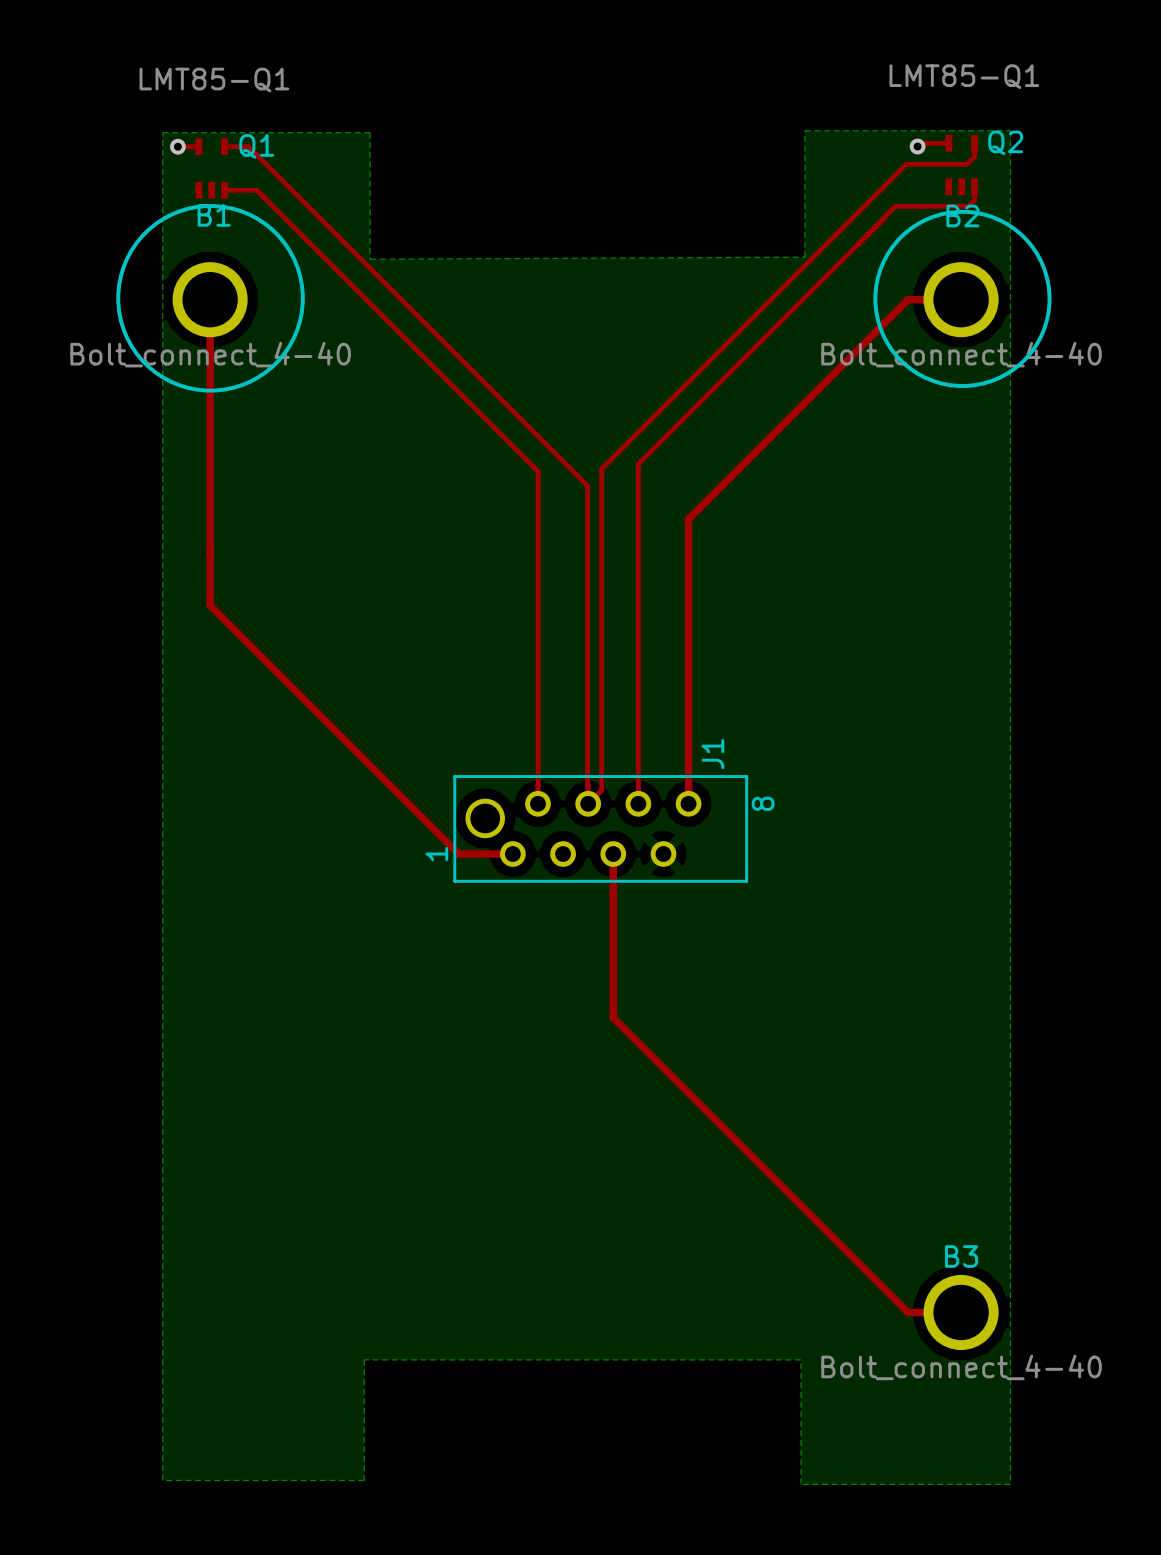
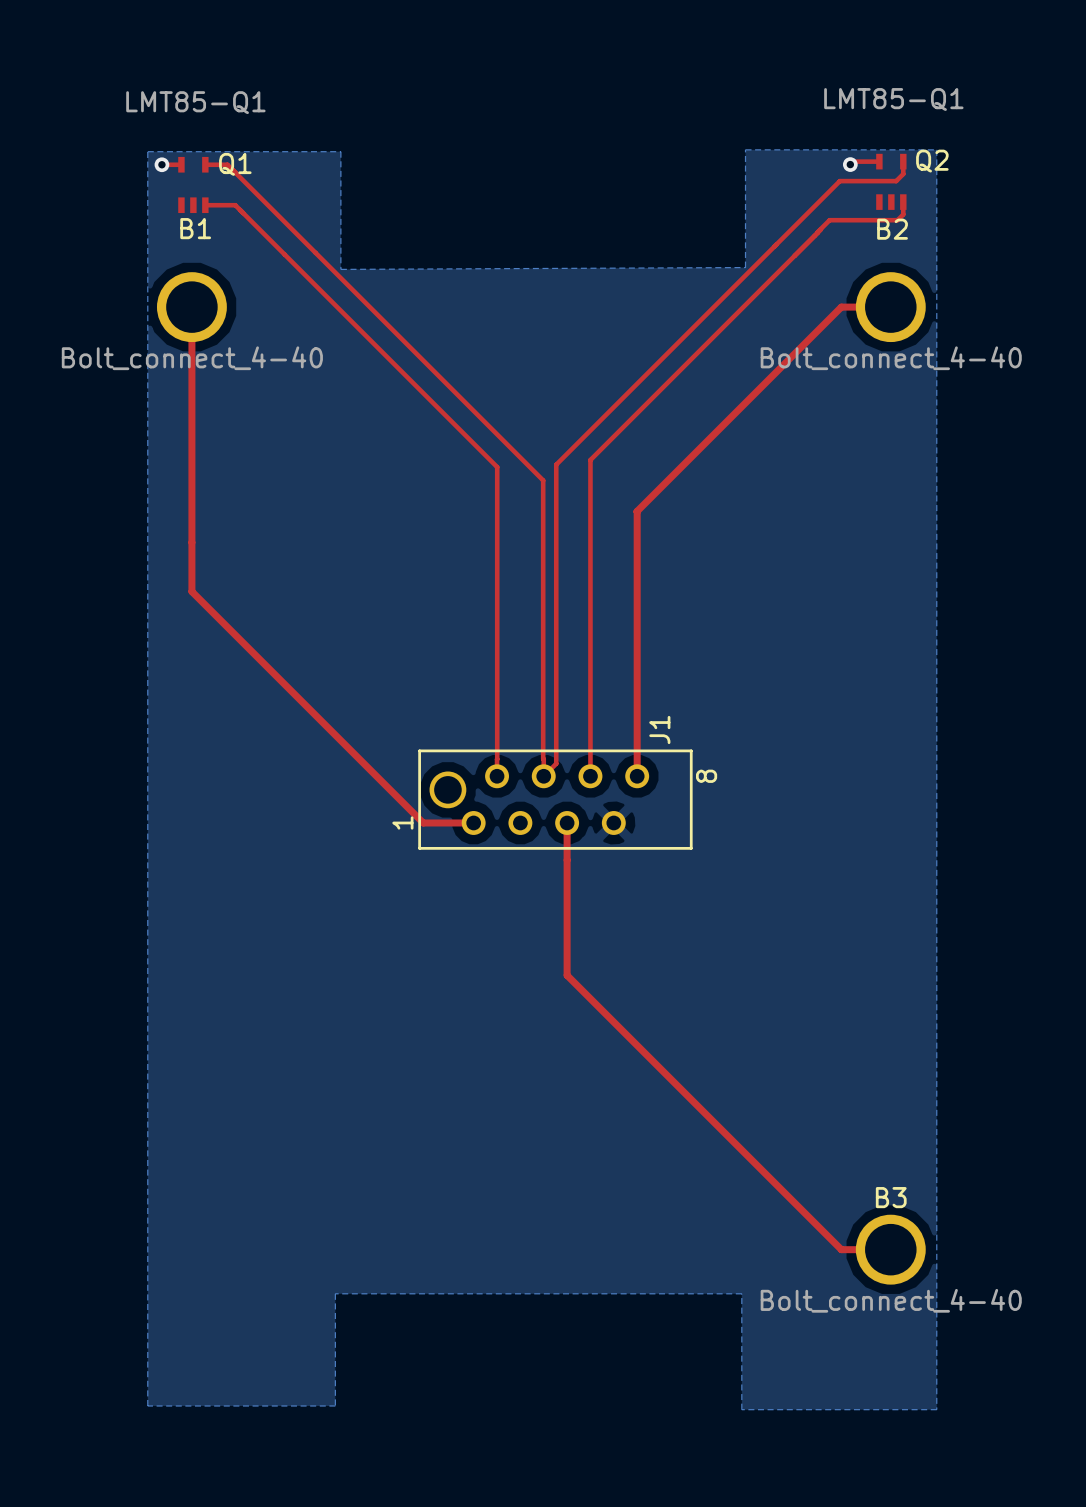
drawing: [116, 204, 305, 393] -> none
drawing: [873, 209, 1052, 388] -> none

